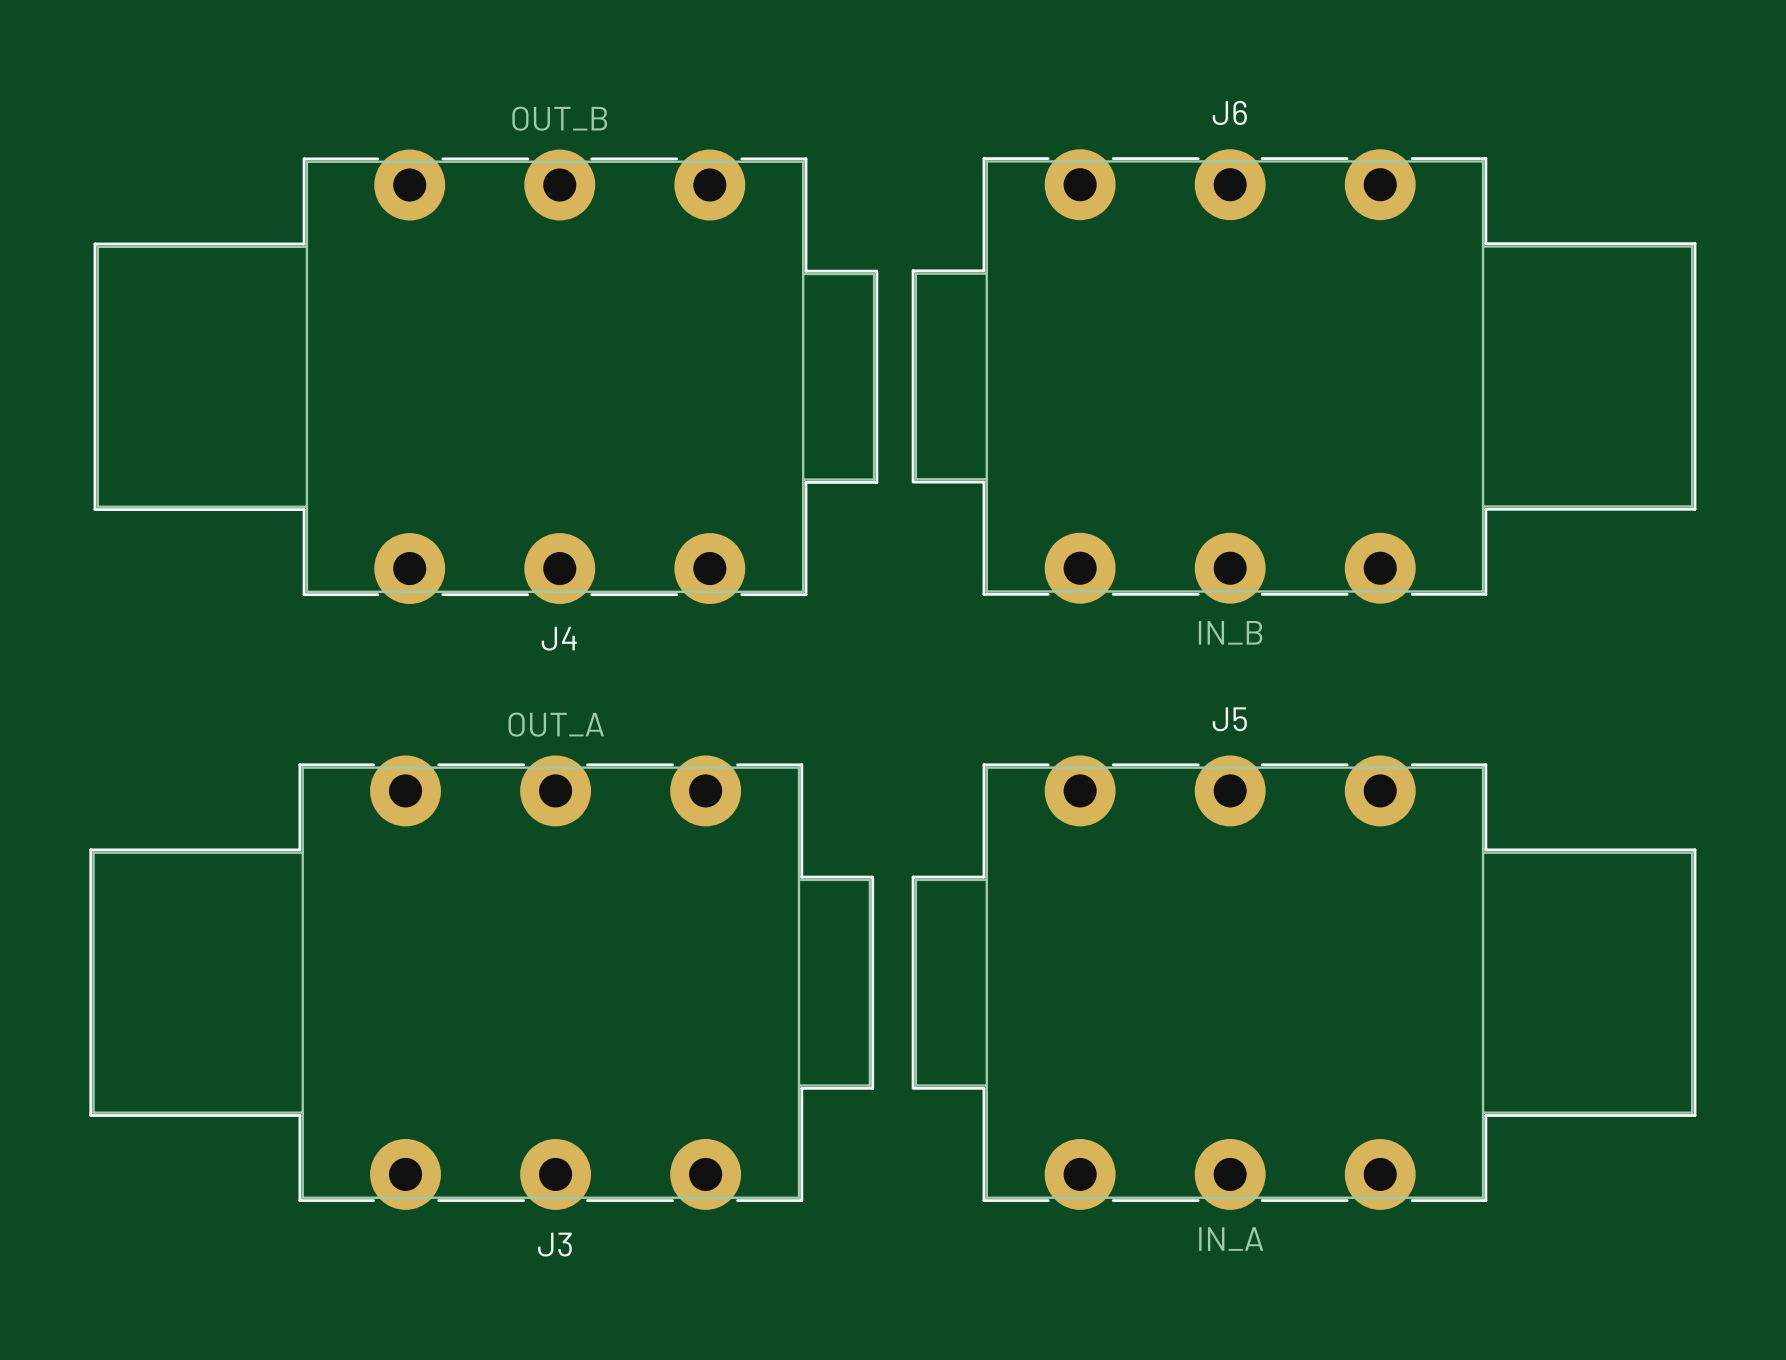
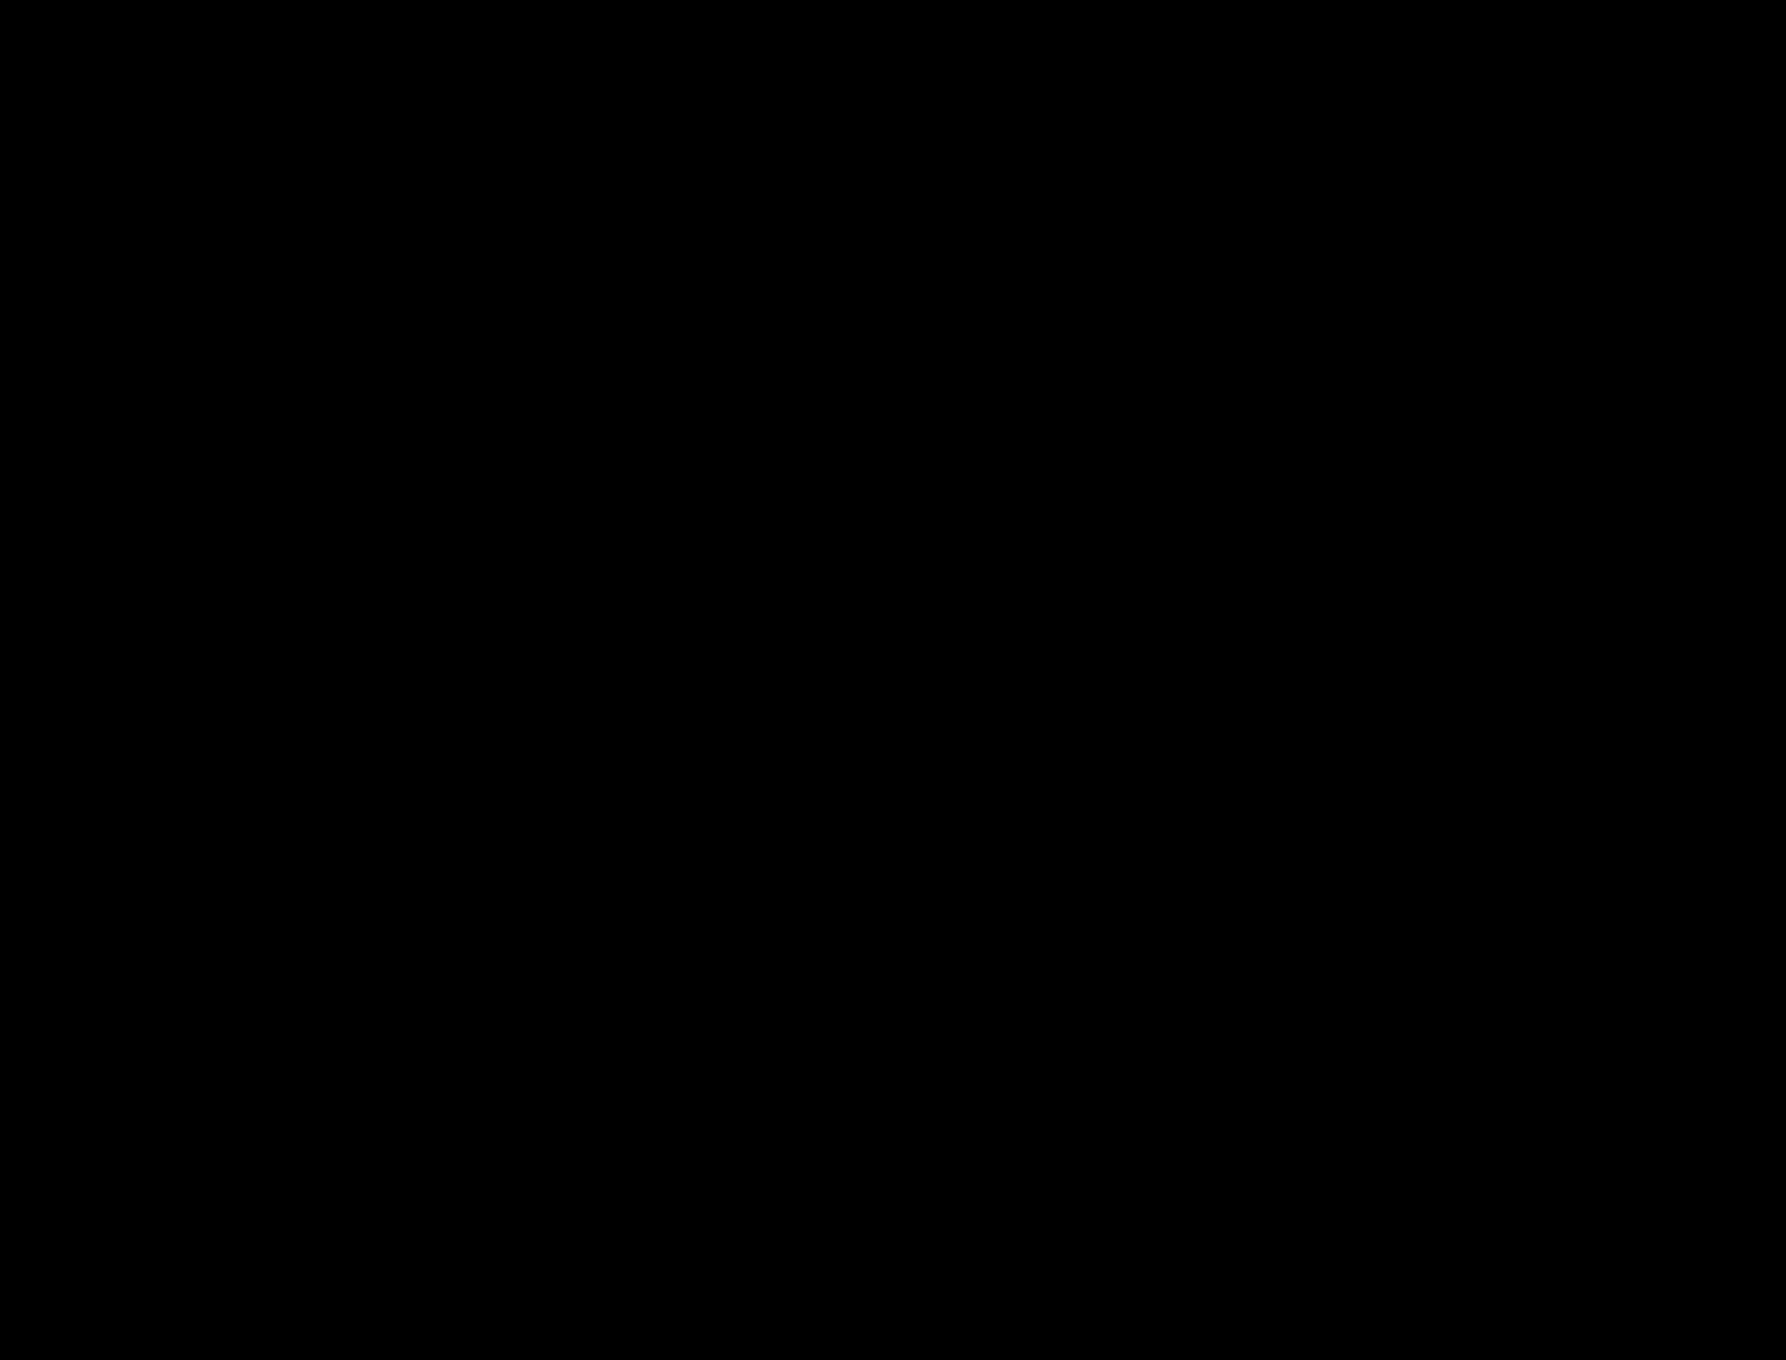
J4: OUT_B (485, 376) -> none
J6: IN_B (1304, 376) -> none
J3: OUT_A (481, 982) -> none
J5: IN_A (1304, 982) -> none

